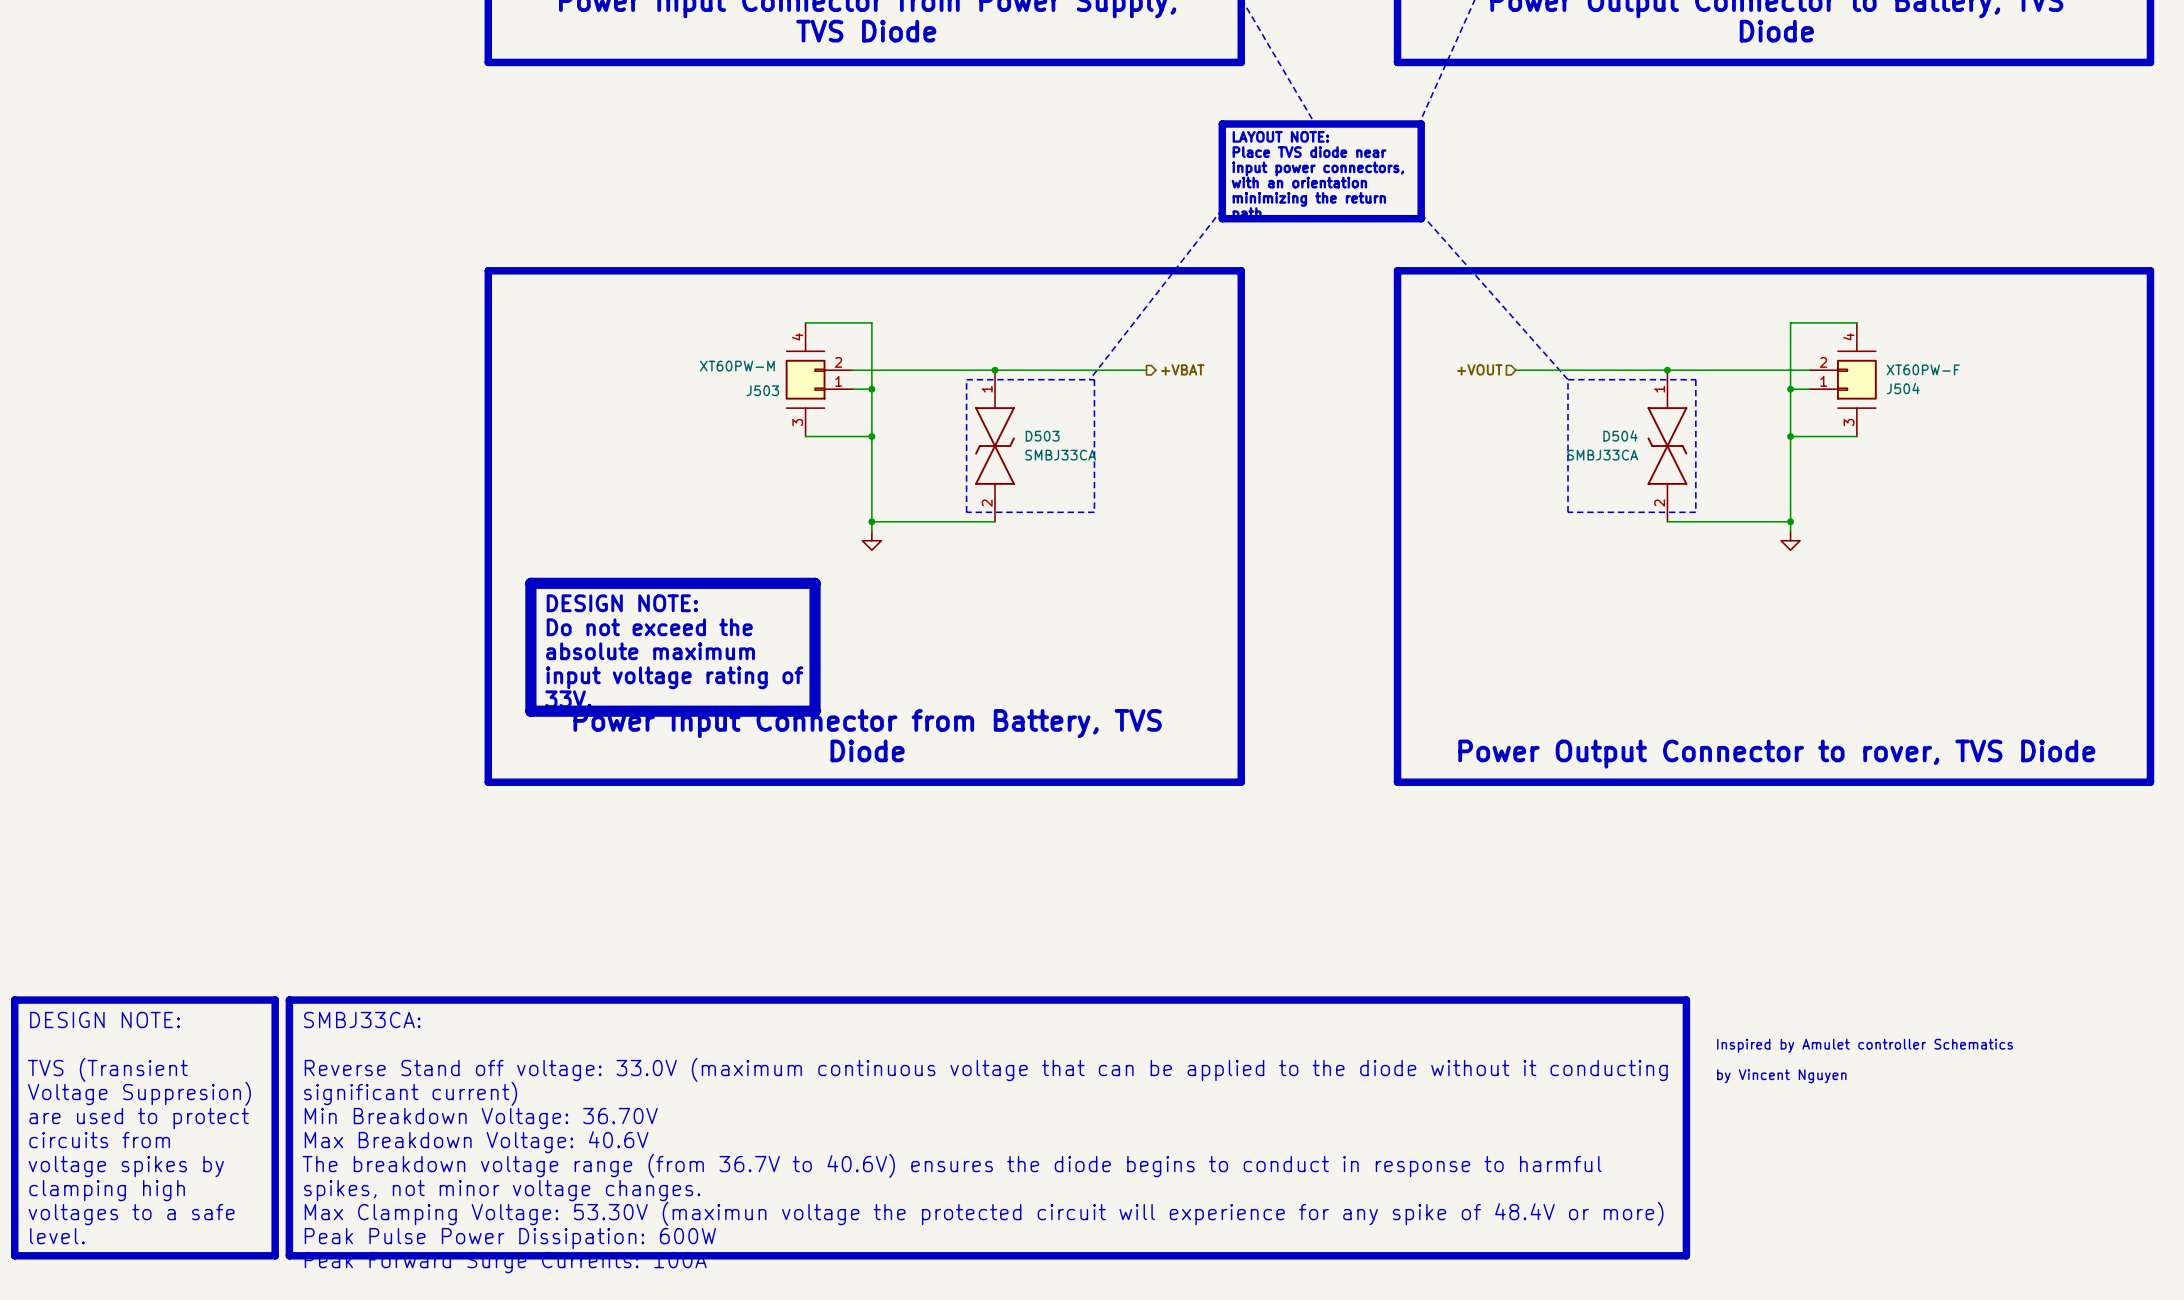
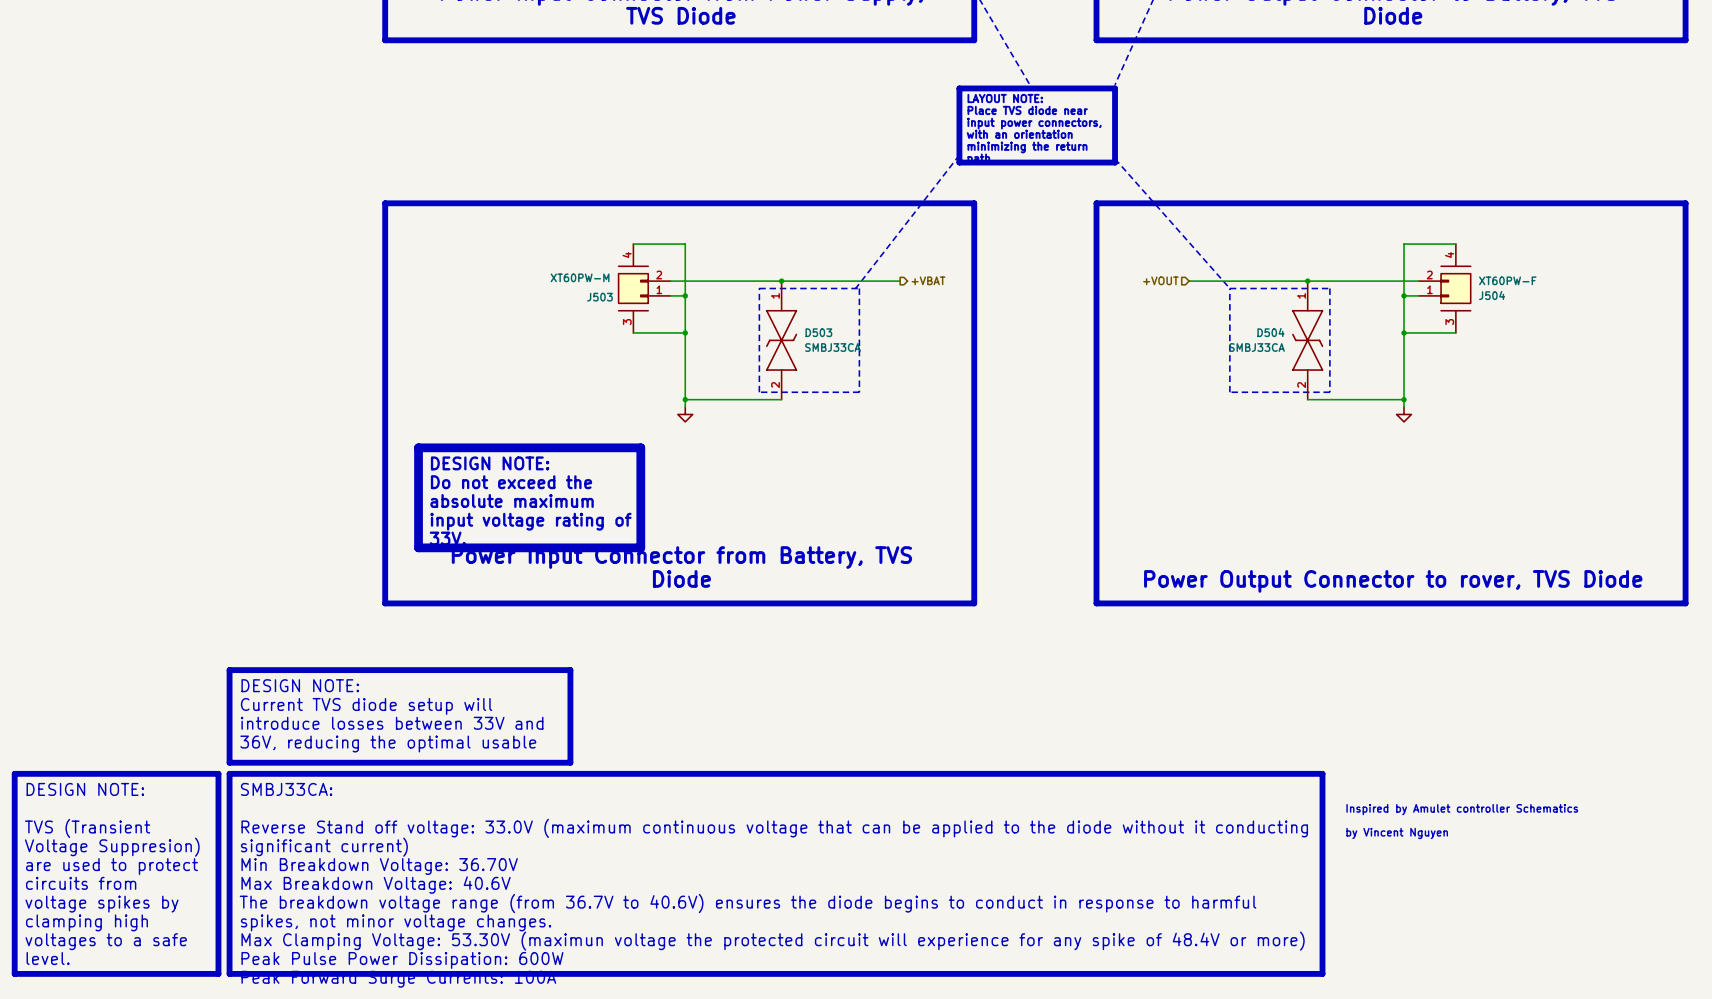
line: none -> (229, 670) (570, 670) (570, 762) (229, 762) (229, 670)
text: none -> DESIGN NOTE: (300, 685)
text: none -> Current TVS diode setup will (366, 706)
text: none -> introduce losses between 33V and (392, 723)
text: none -> 36V, reducing the optimal usable (388, 744)

